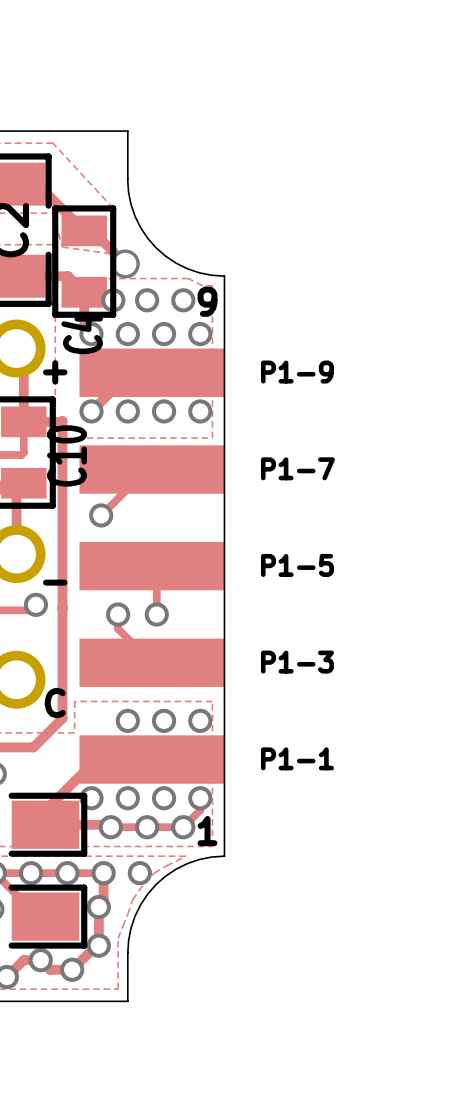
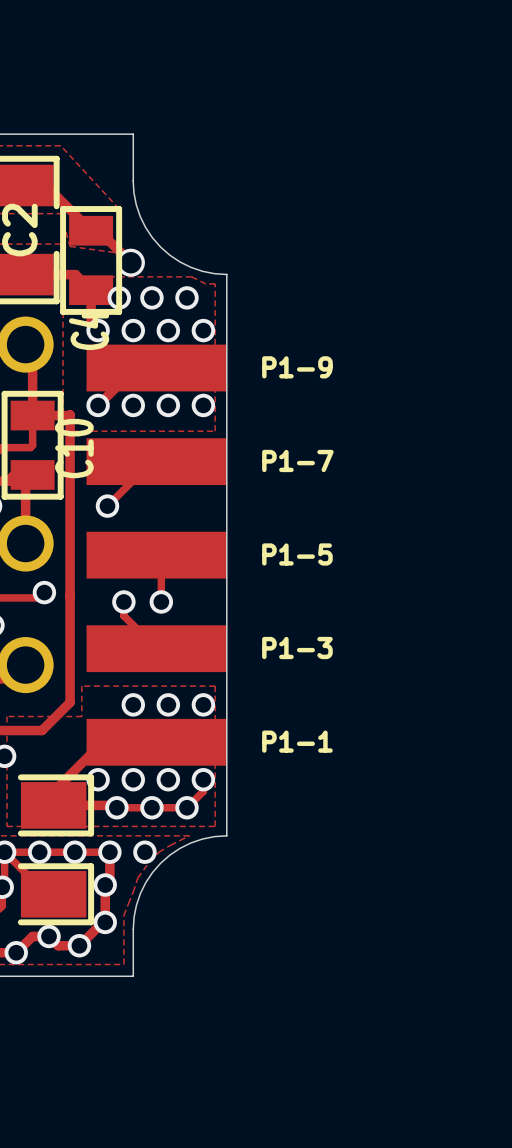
text: 9 (207, 301) -> none
text: + (55, 372) -> none
text: - (55, 582) -> none
text: C (55, 703) -> none
text: 1 (207, 831) -> none

